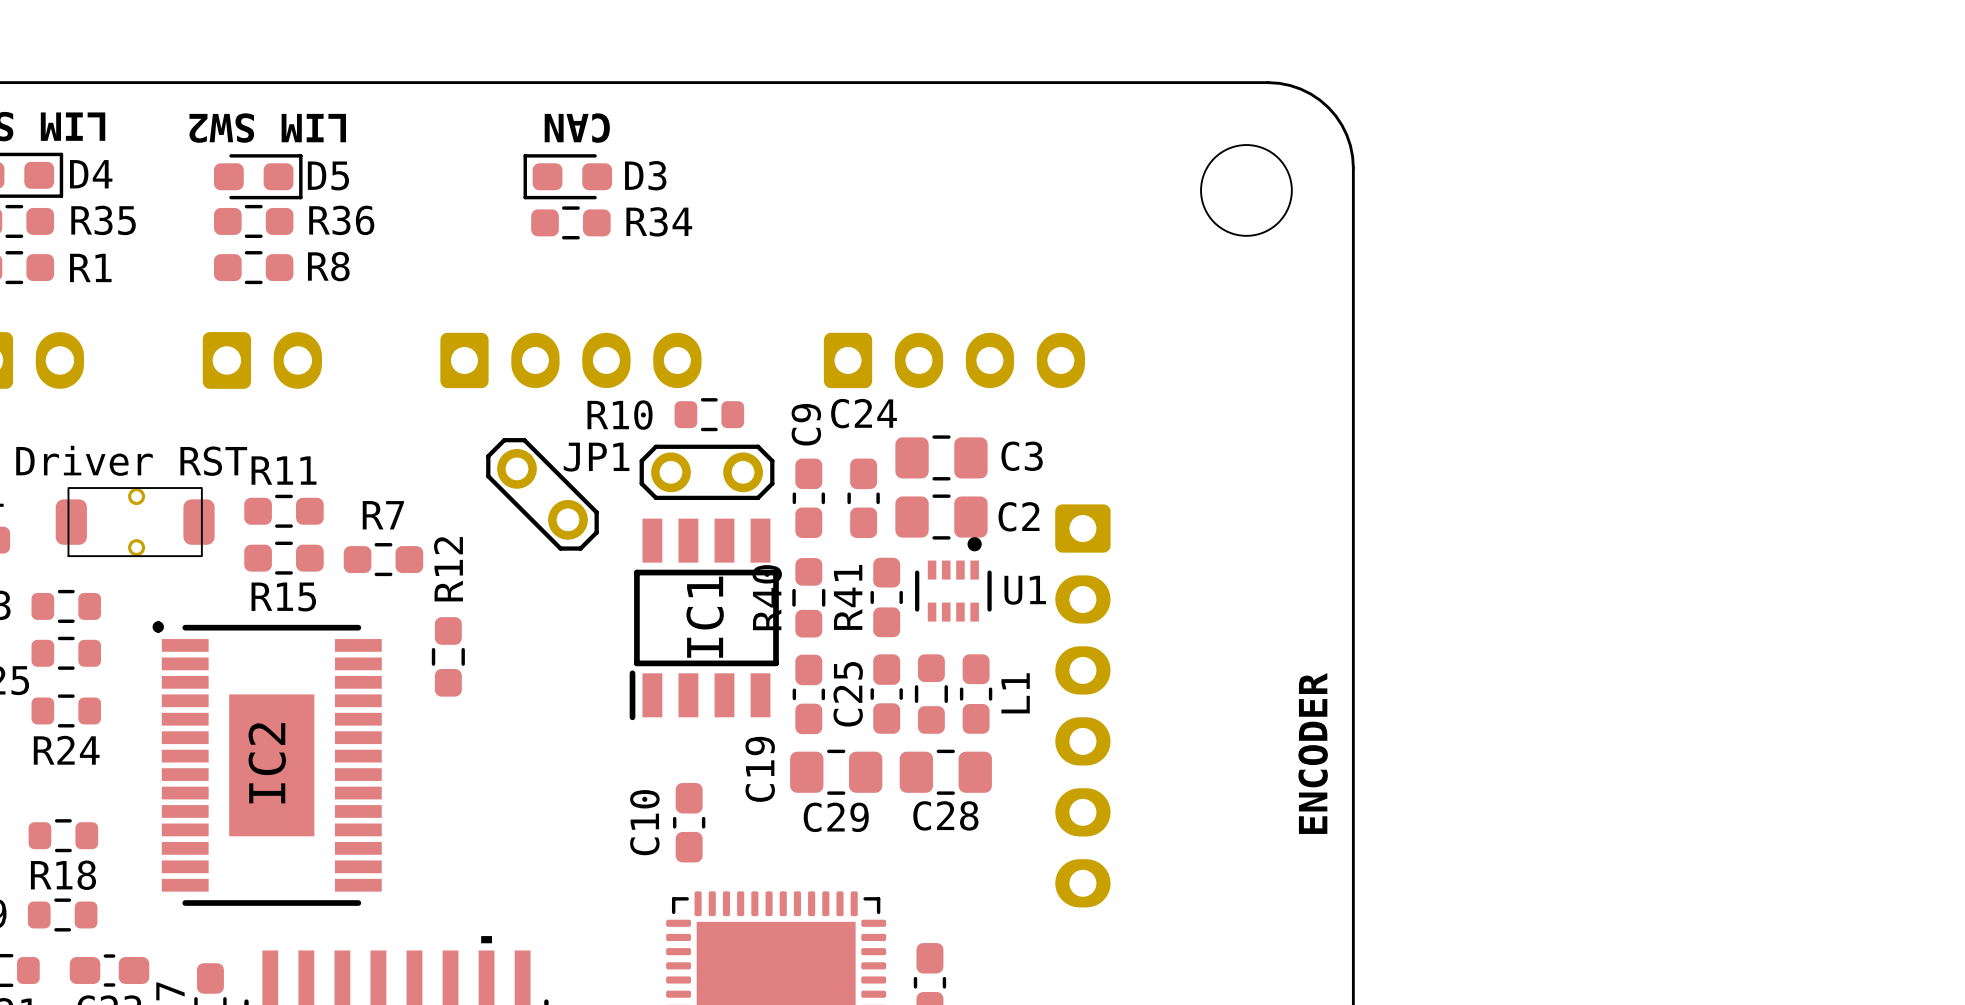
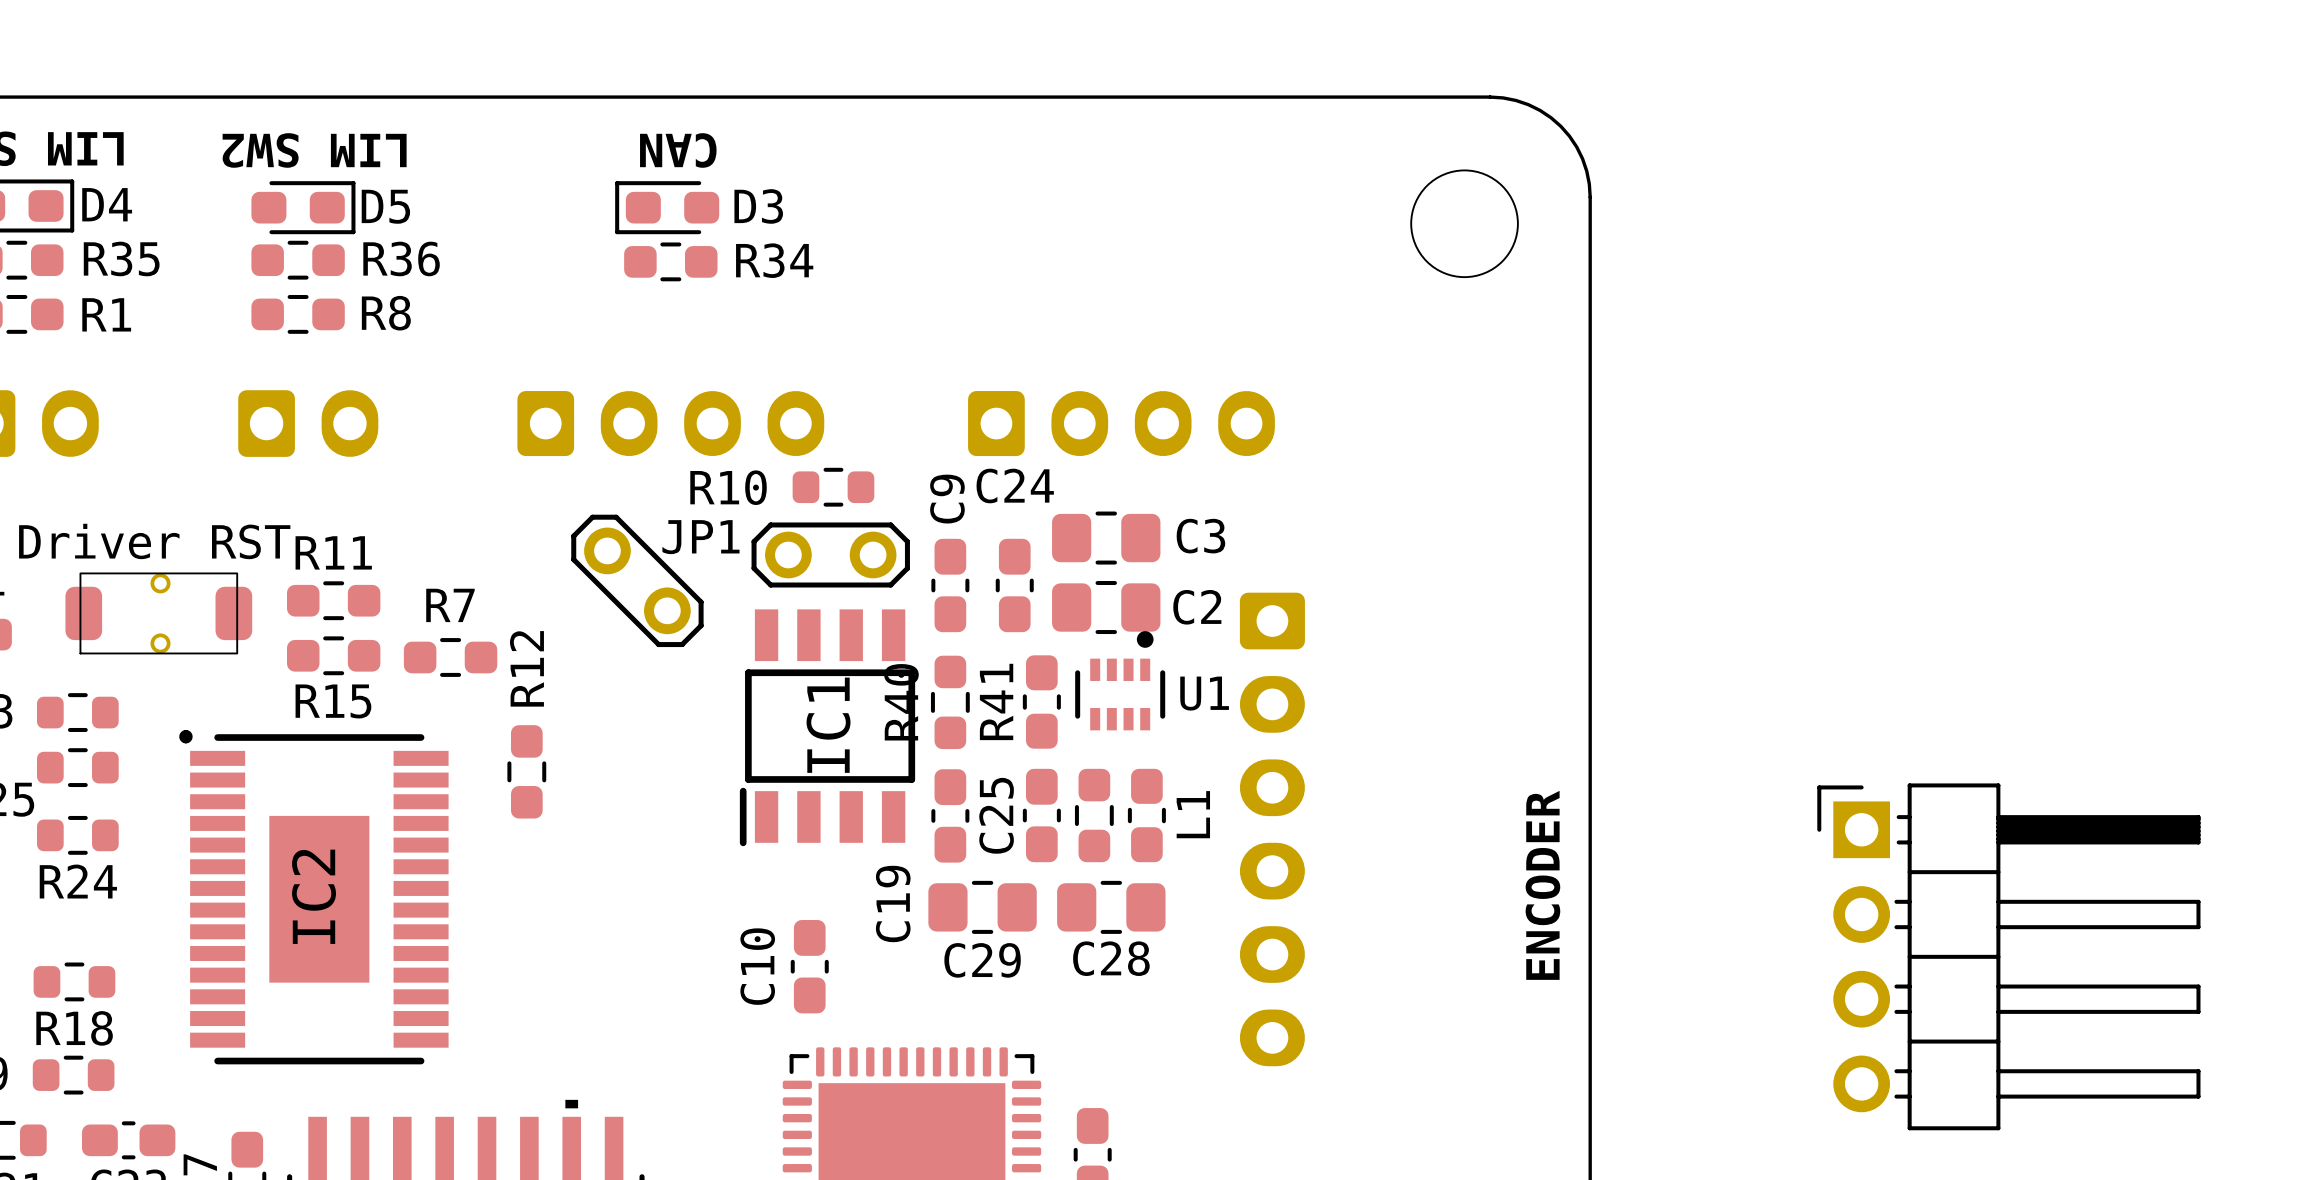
part: none -> (2008, 956)

